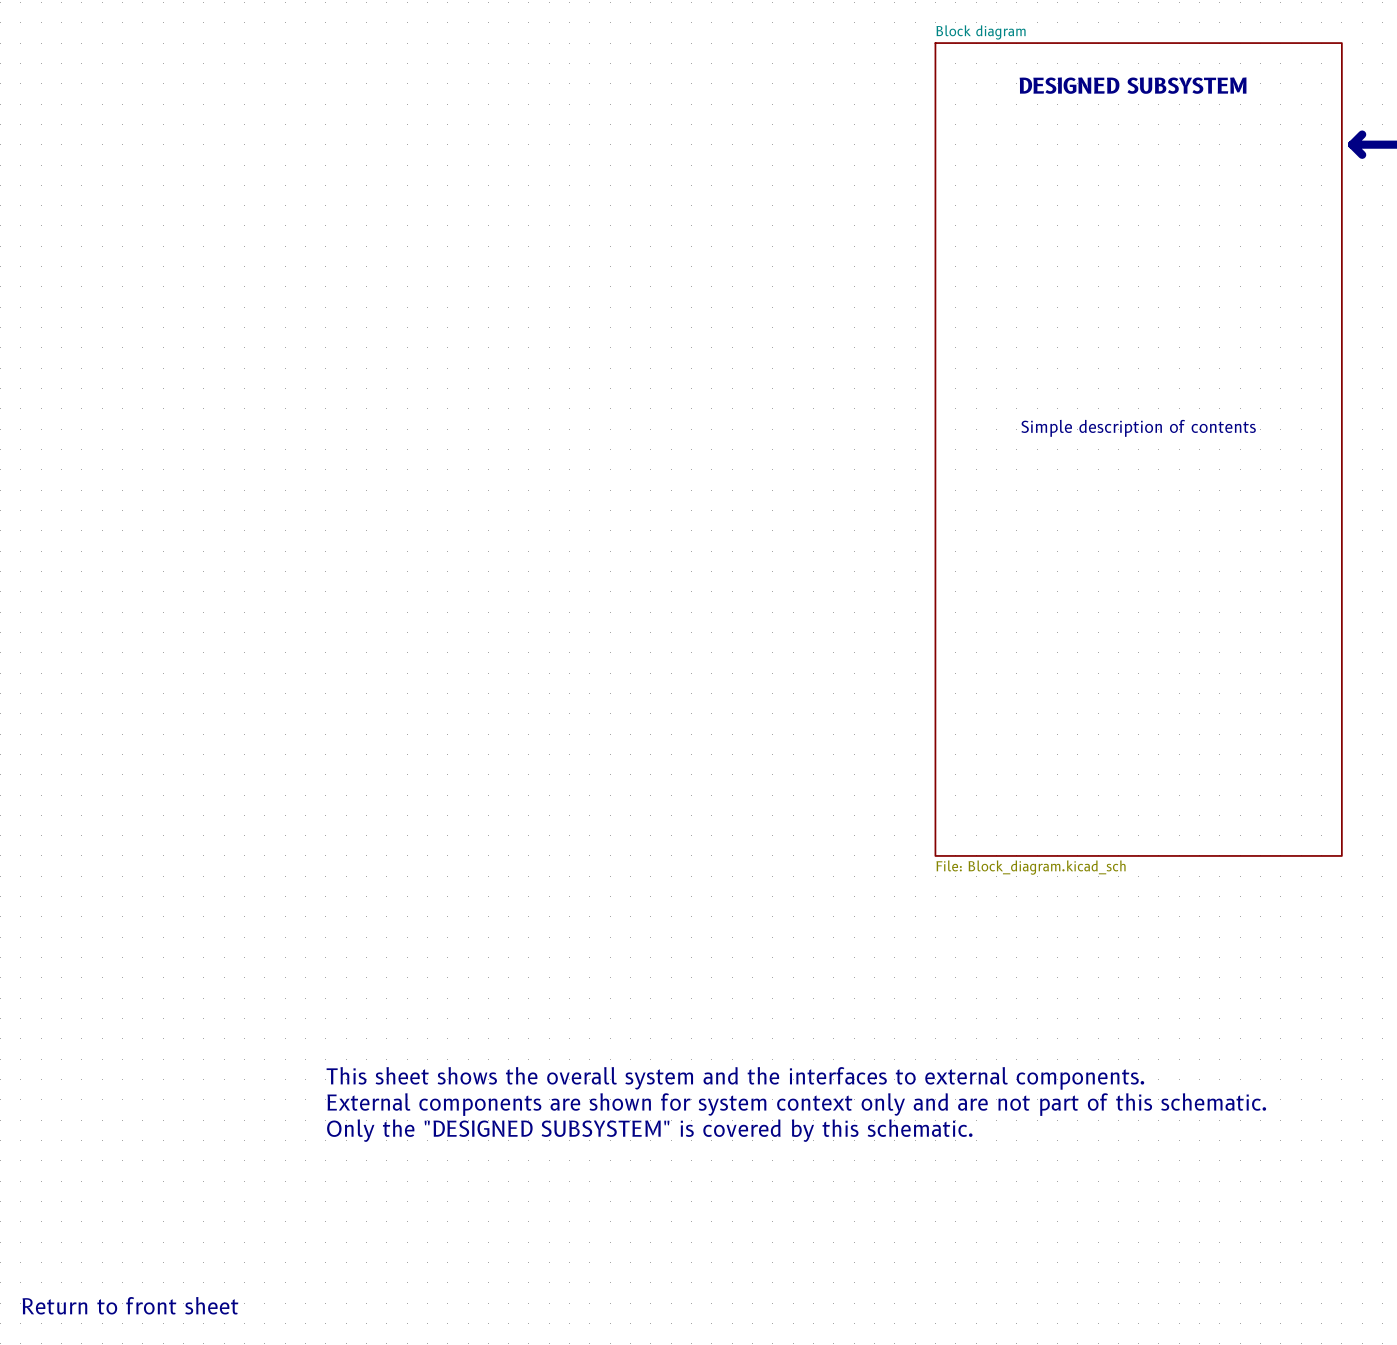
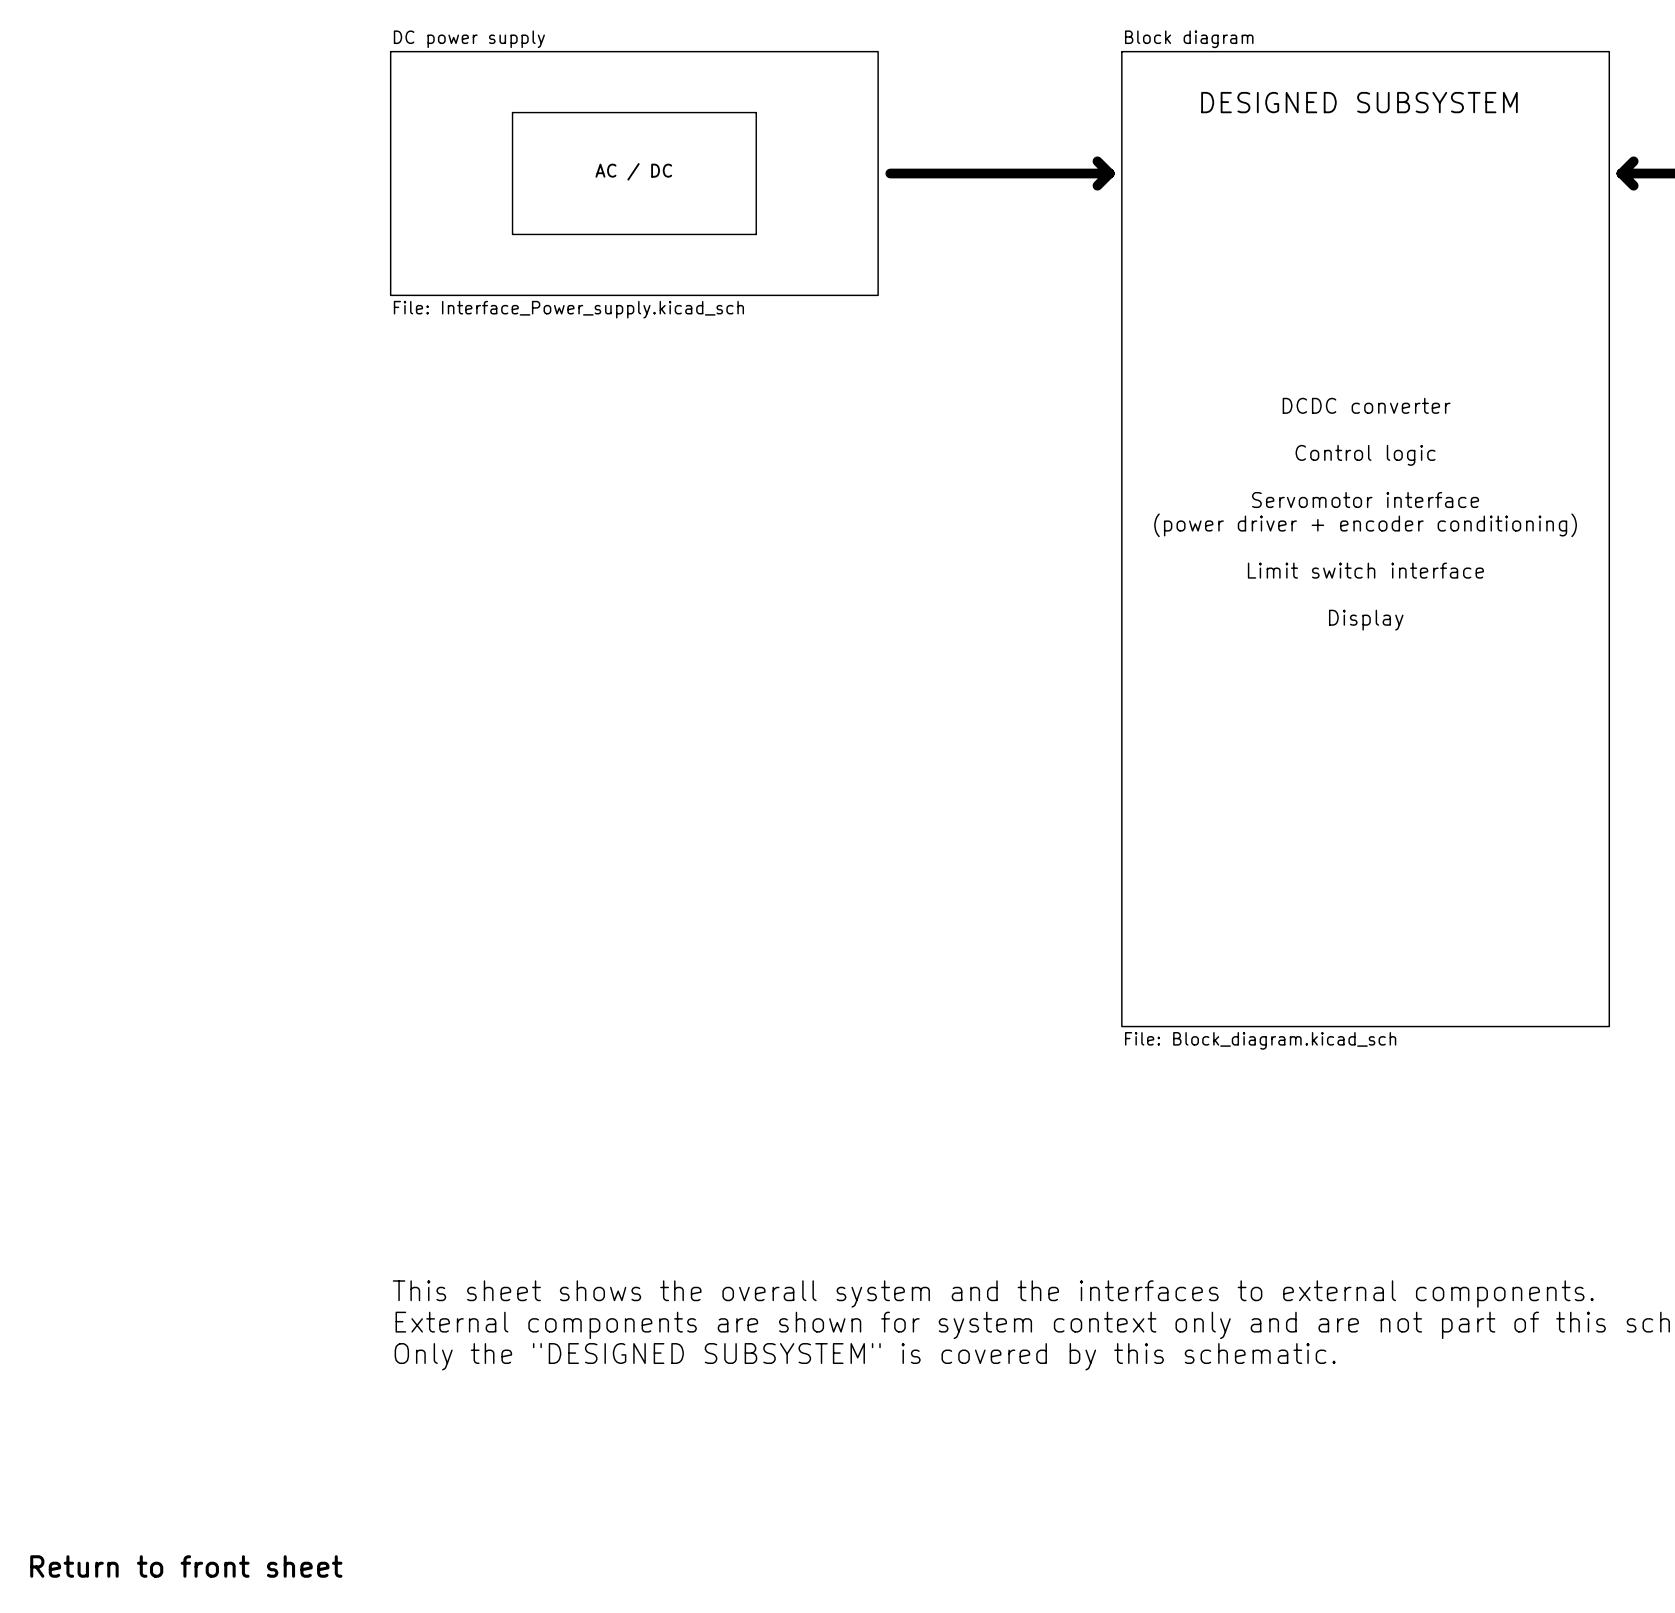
line: none -> (512, 112) (756, 112) (756, 234) (512, 234) (512, 112)
line: none -> (1097, 161) (1109, 173)
text: none -> AC / DC (633, 171)
sheet DC power supply: none -> File: Interface_Power_supply.kicad_sch (634, 173)
line: none -> (890, 173) (1109, 173)
line: none -> (1109, 173) (1097, 185)
text: none -> DCDC converter (1366, 405)
text: none -> Control logic (1365, 455)
text: none -> Servomotor interface (1365, 500)
text: Simple description of contents (1138, 428) -> none
text: none -> (power driver + encoder conditioning) (1365, 525)
text: none -> Limit switch interface (1365, 570)
text: none -> Display (1366, 620)

